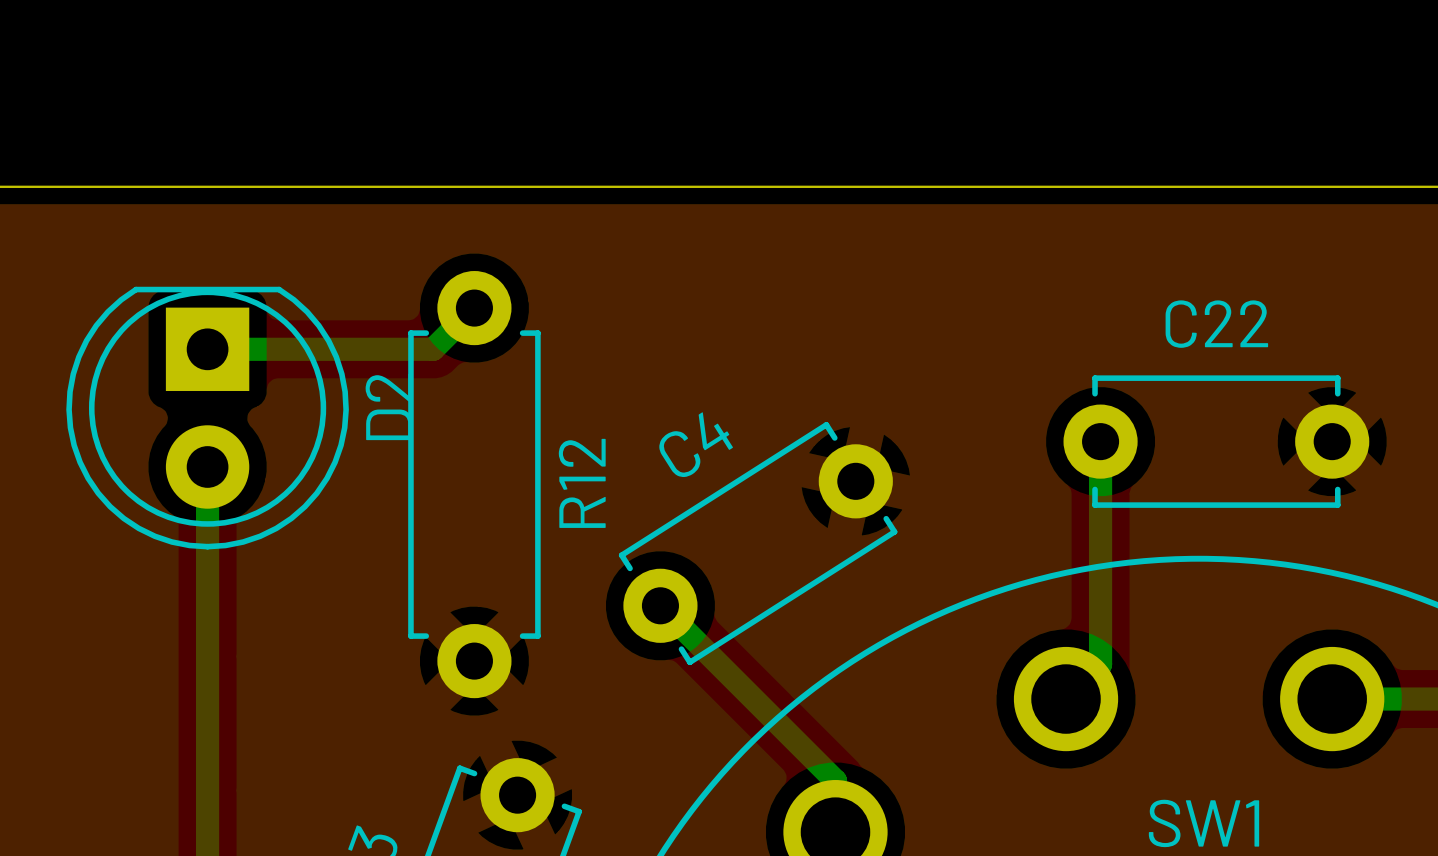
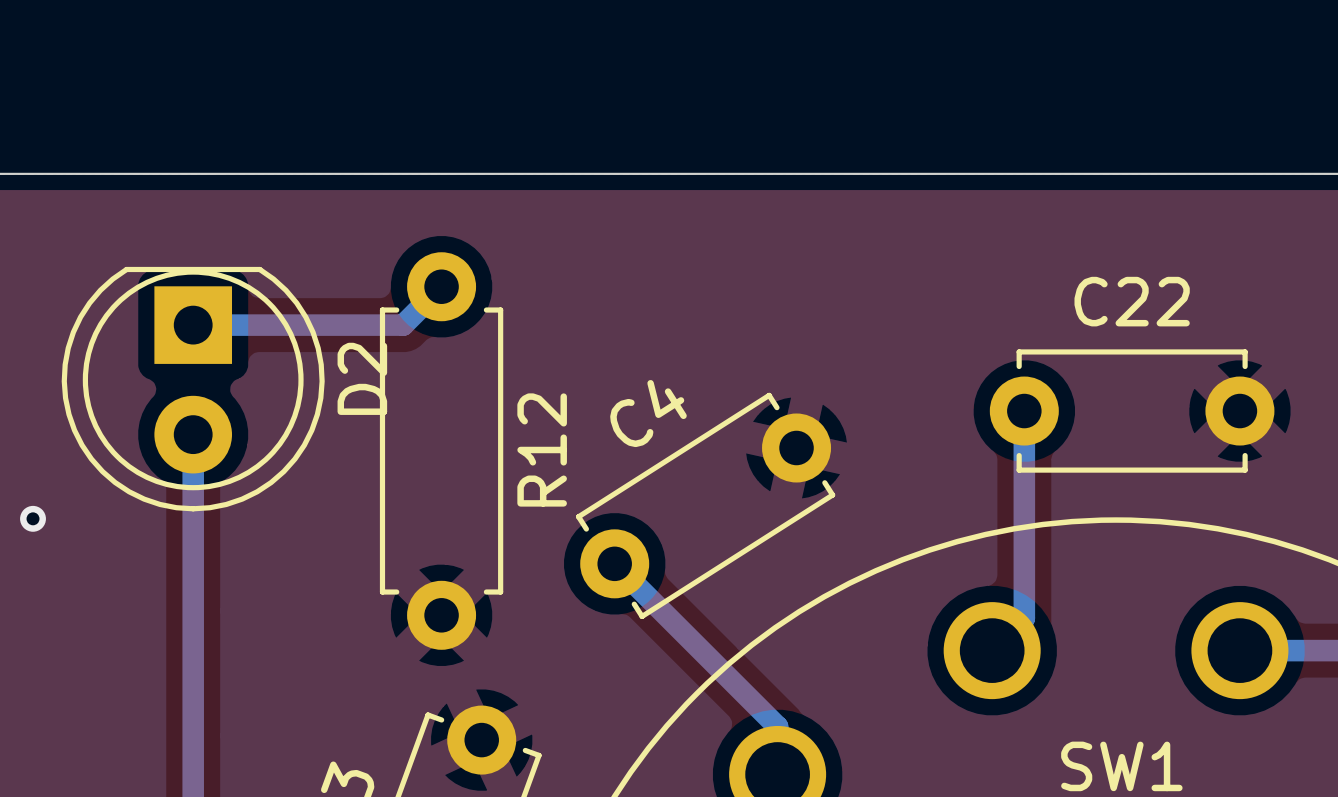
via: none -> (33, 518)

